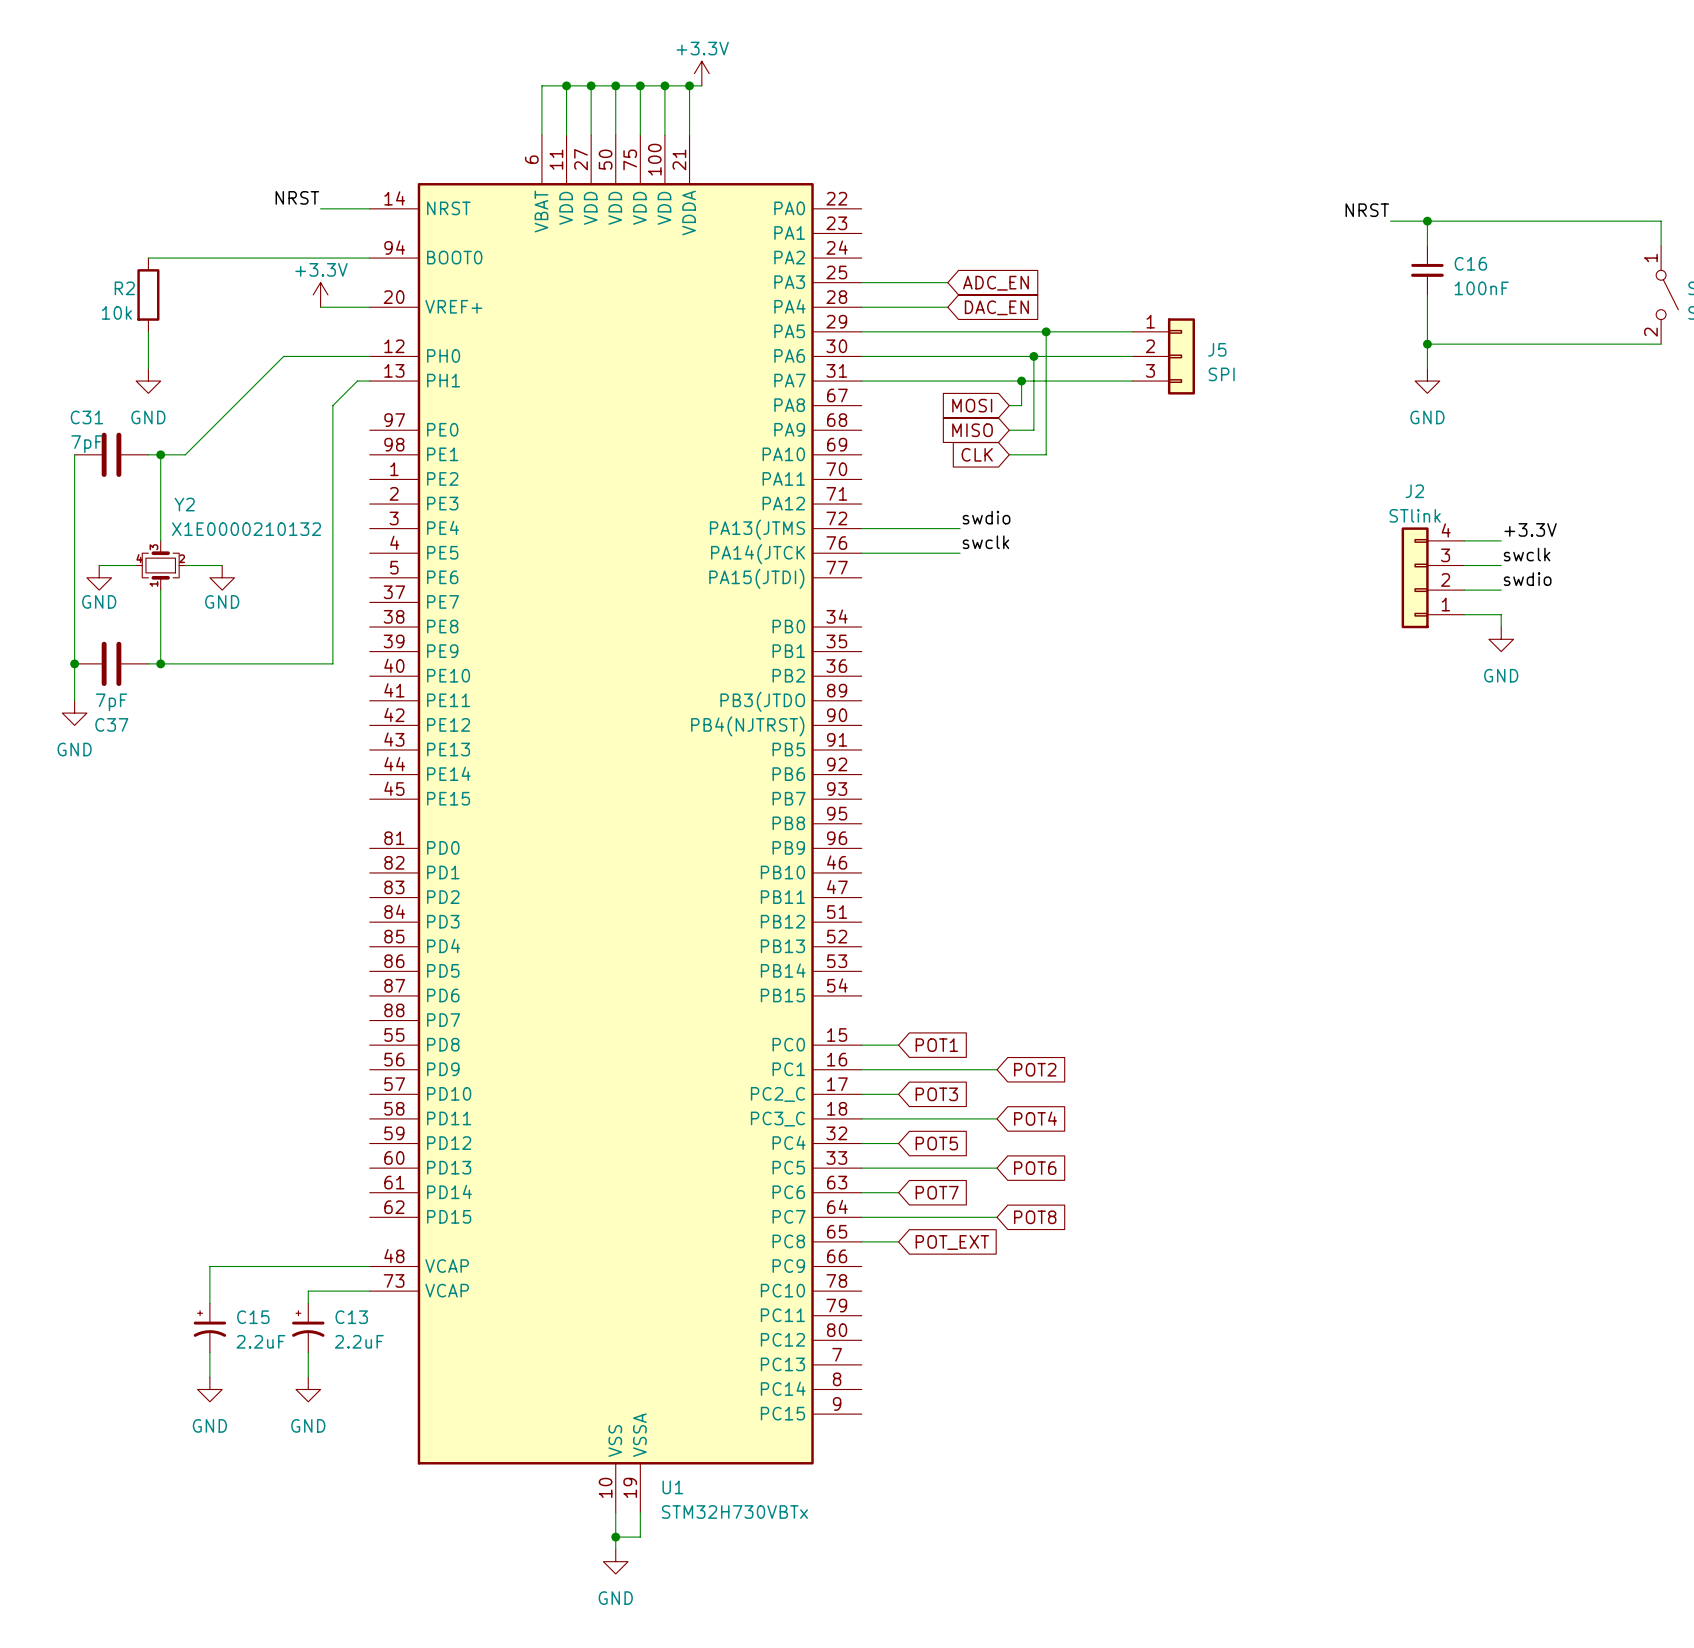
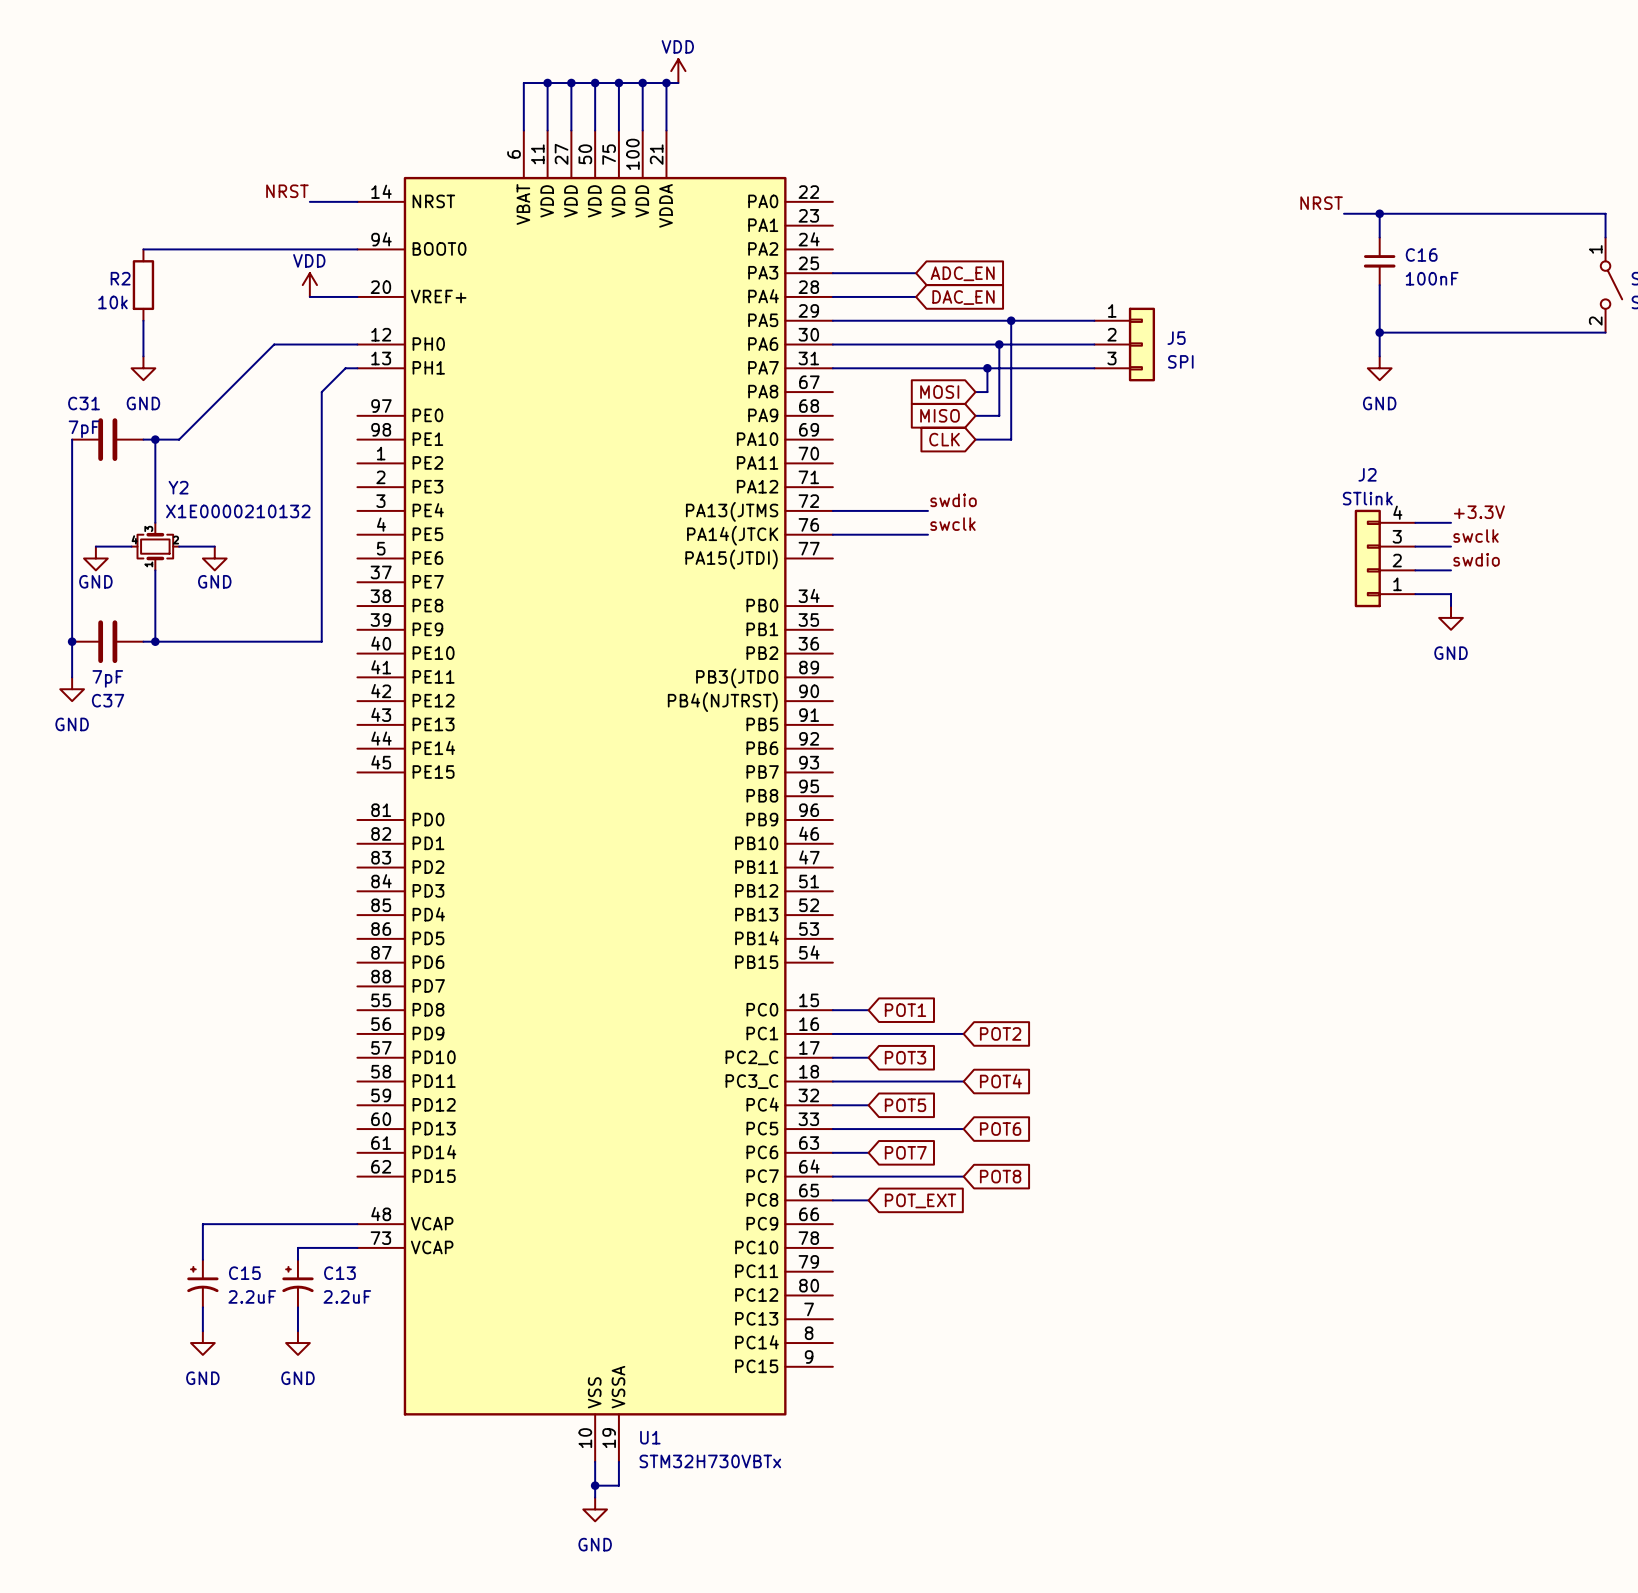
power symbol: +3.3V (701, 73) -> VDD (678, 71)
power symbol: +3.3V (320, 294) -> VDD (309, 285)

